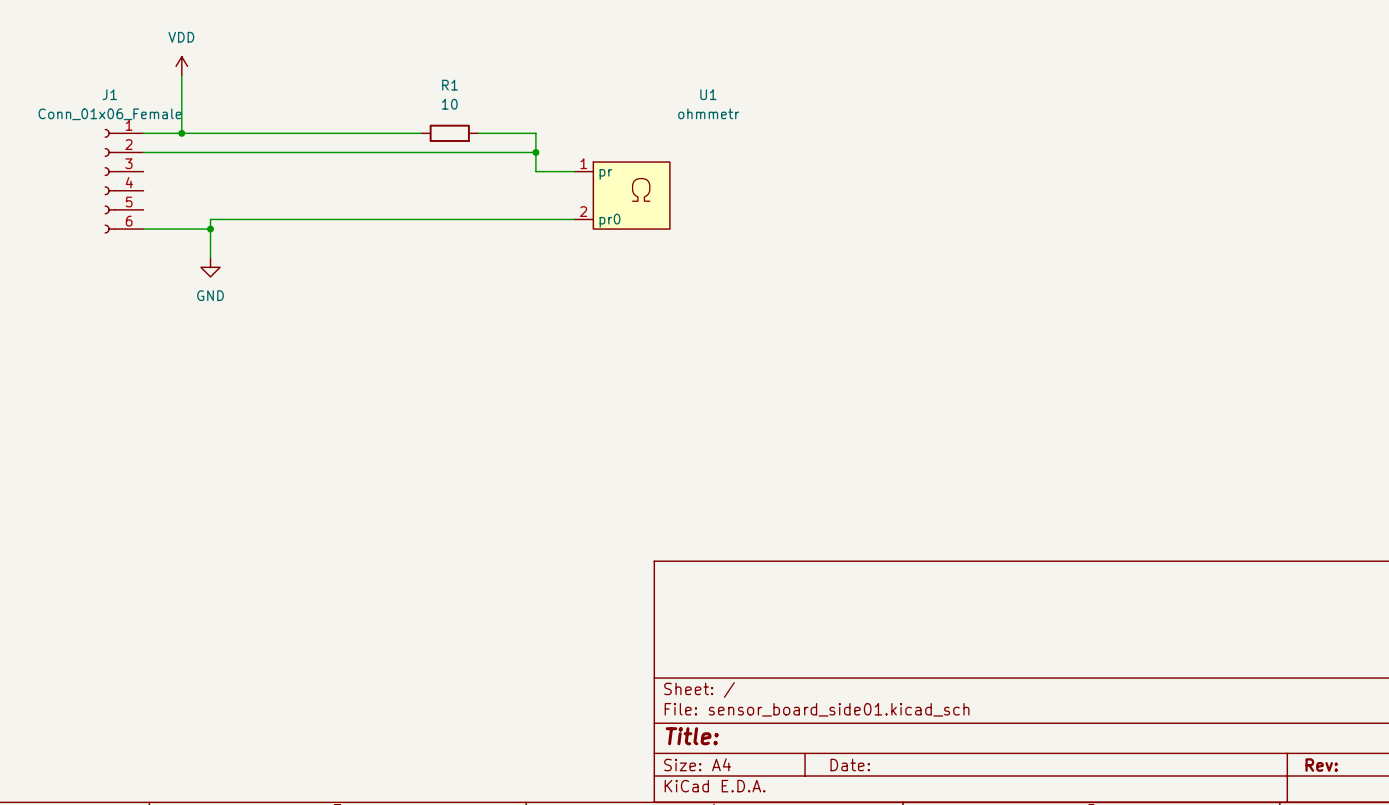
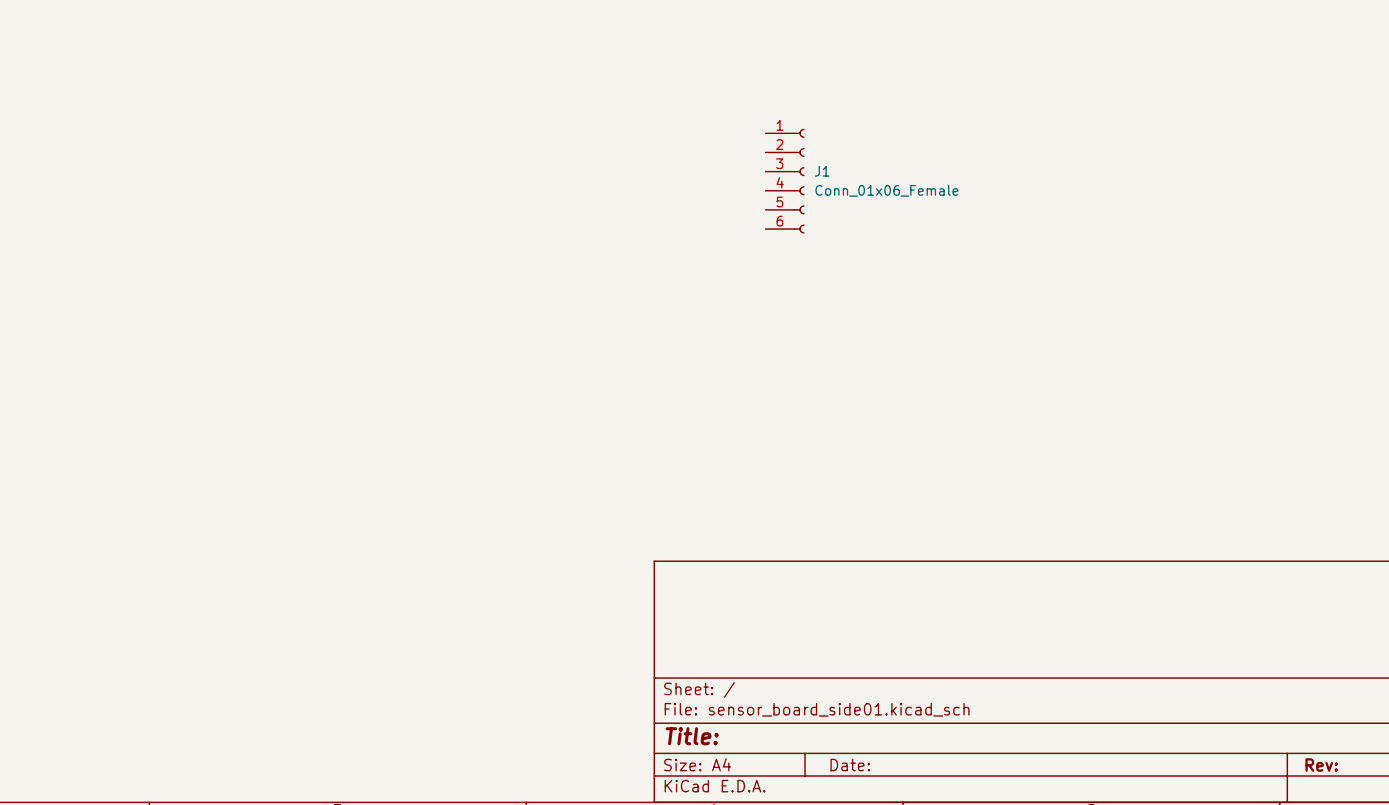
power symbol: VDD (181, 66) -> none
wire: (181, 75) (181, 133) -> none
J1 name position: J1 (109, 94) -> J1 (822, 171)
J1 value position: Conn_01x06_Female (110, 114) -> Conn_01x06_Female (886, 190)
wire: (143, 133) (421, 133) -> none
junction: (181, 133) -> none
R1: 10 (449, 133) -> none
wire: (478, 133) (535, 133) (535, 171) (574, 171) -> none
wire: (143, 152) (535, 152) -> none
junction: (535, 152) -> none
J1 flip: as is (110, 181) -> left-right (799, 181)
J1 position: (124, 181) -> (785, 181)
U1: ohmmetr (708, 181) -> none
wire: (574, 219) (210, 219) (210, 257) -> none
wire: (143, 229) (210, 229) -> none
junction: (210, 229) -> none
power symbol: GND (210, 267) -> none

